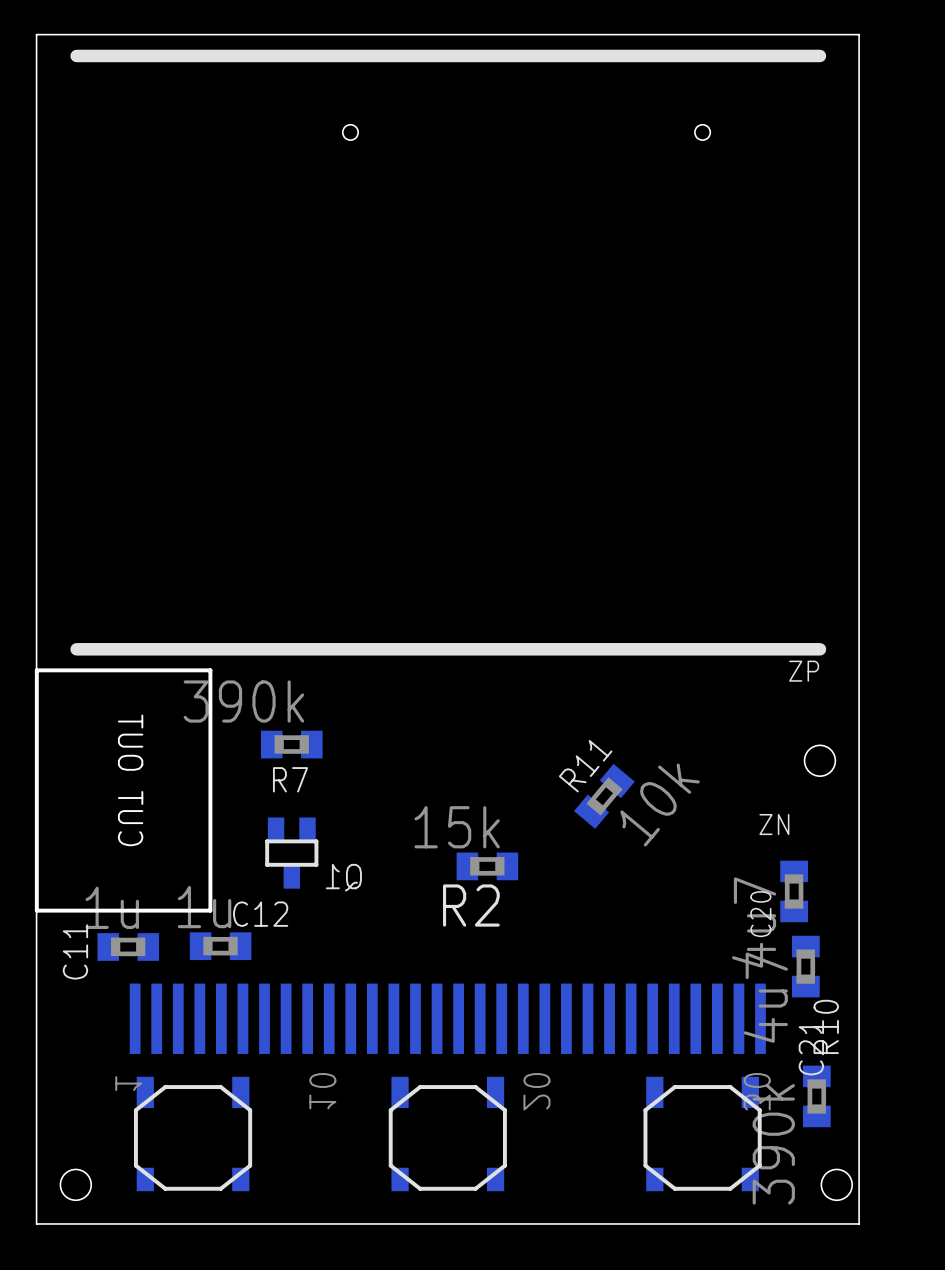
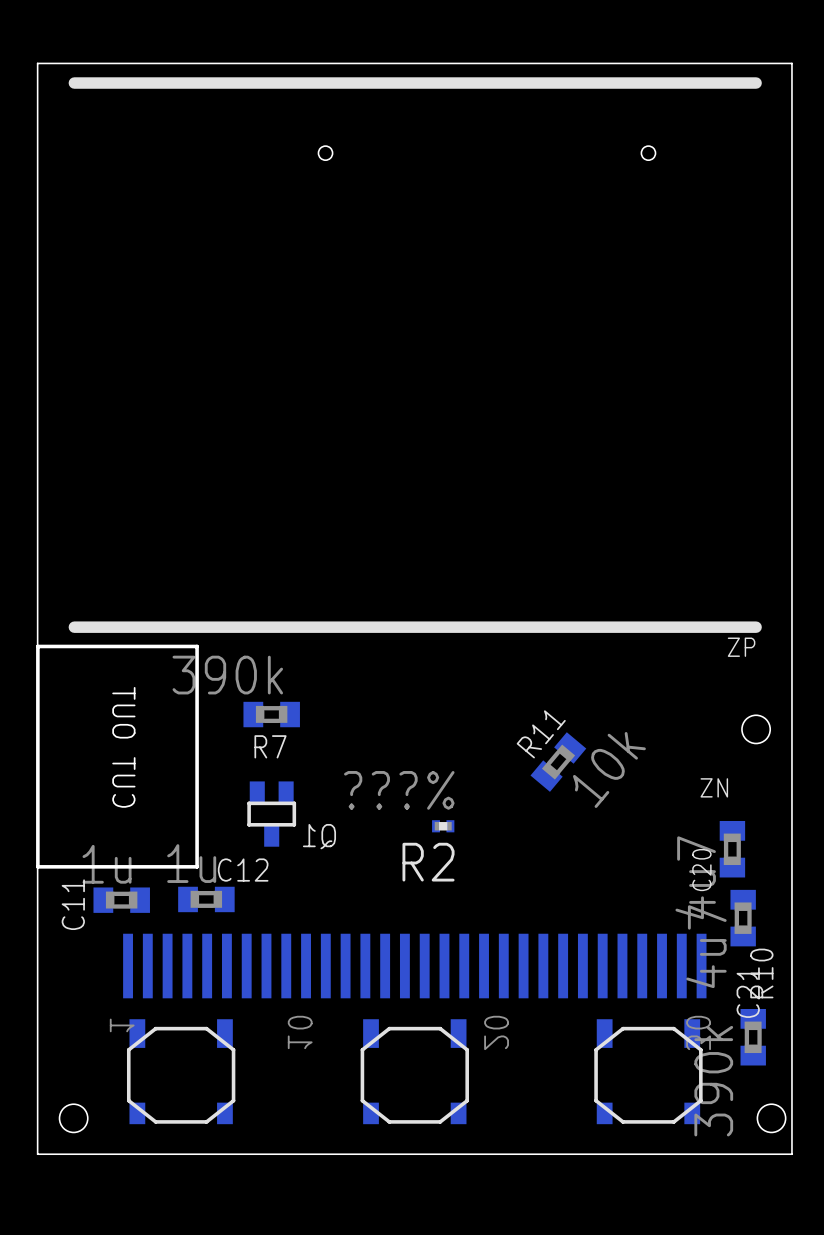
R2 value: 15k (457, 827) -> ???% (399, 790)
R2 footprint: [456, 852, 519, 881] -> [432, 820, 455, 833]

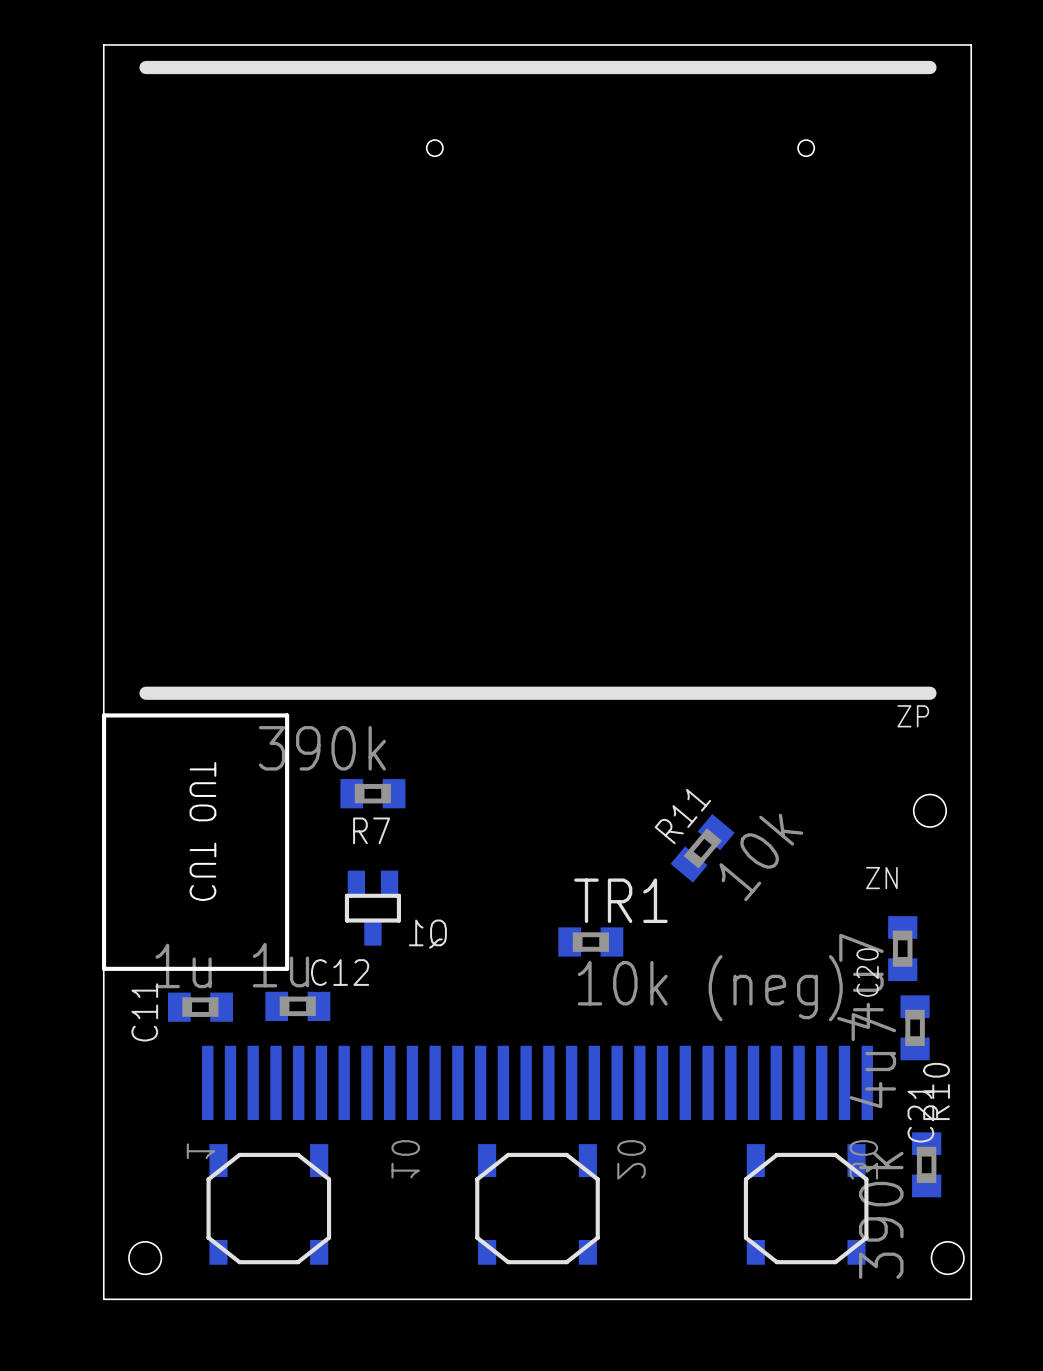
R2: ???% (443, 826) -> none
TR1: none -> 10k (neg) (590, 942)

